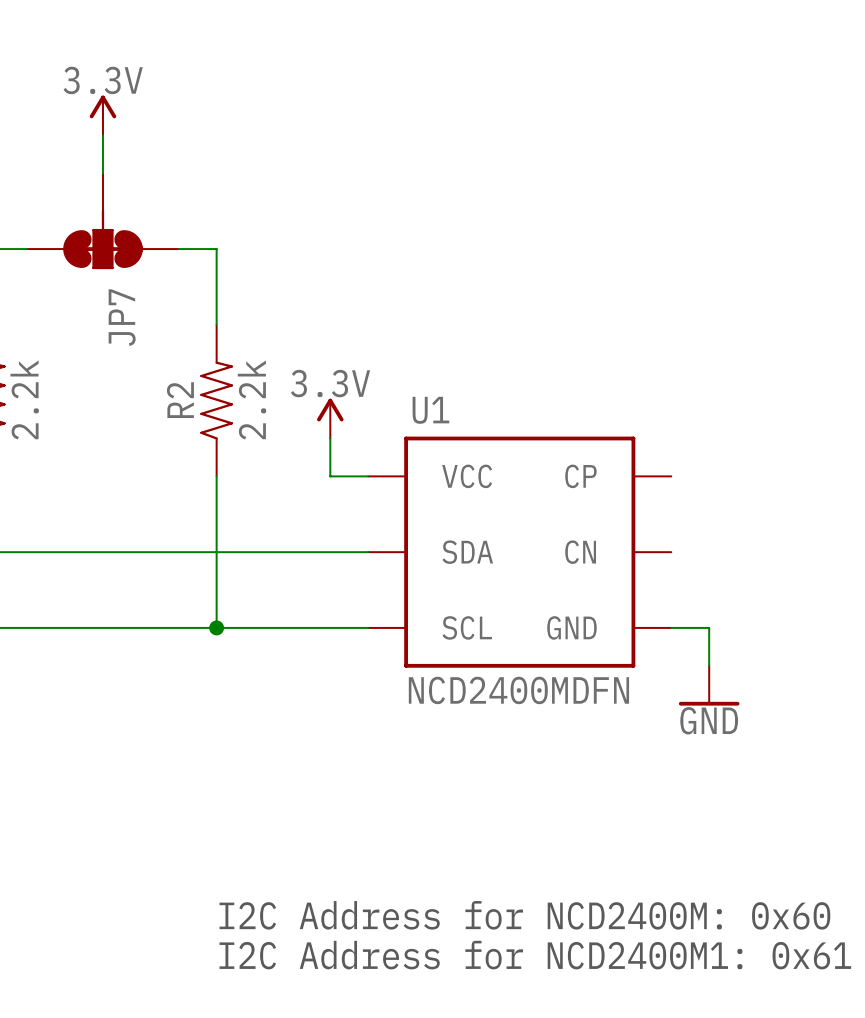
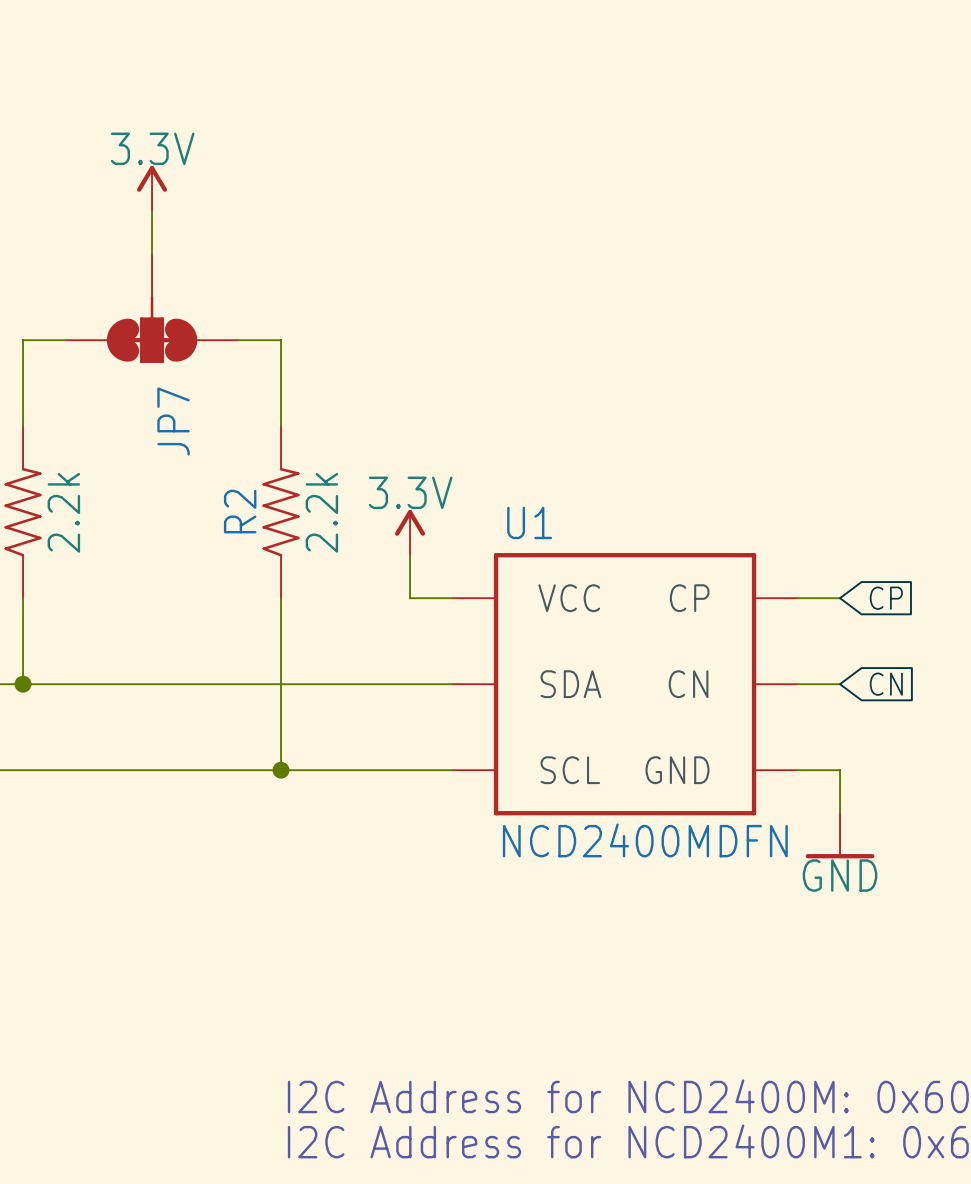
wire: none -> (797, 598) (840, 598)
global label: none -> CP (886, 598)
wire: none -> (797, 684) (840, 684)
global label: none -> CN (886, 684)

